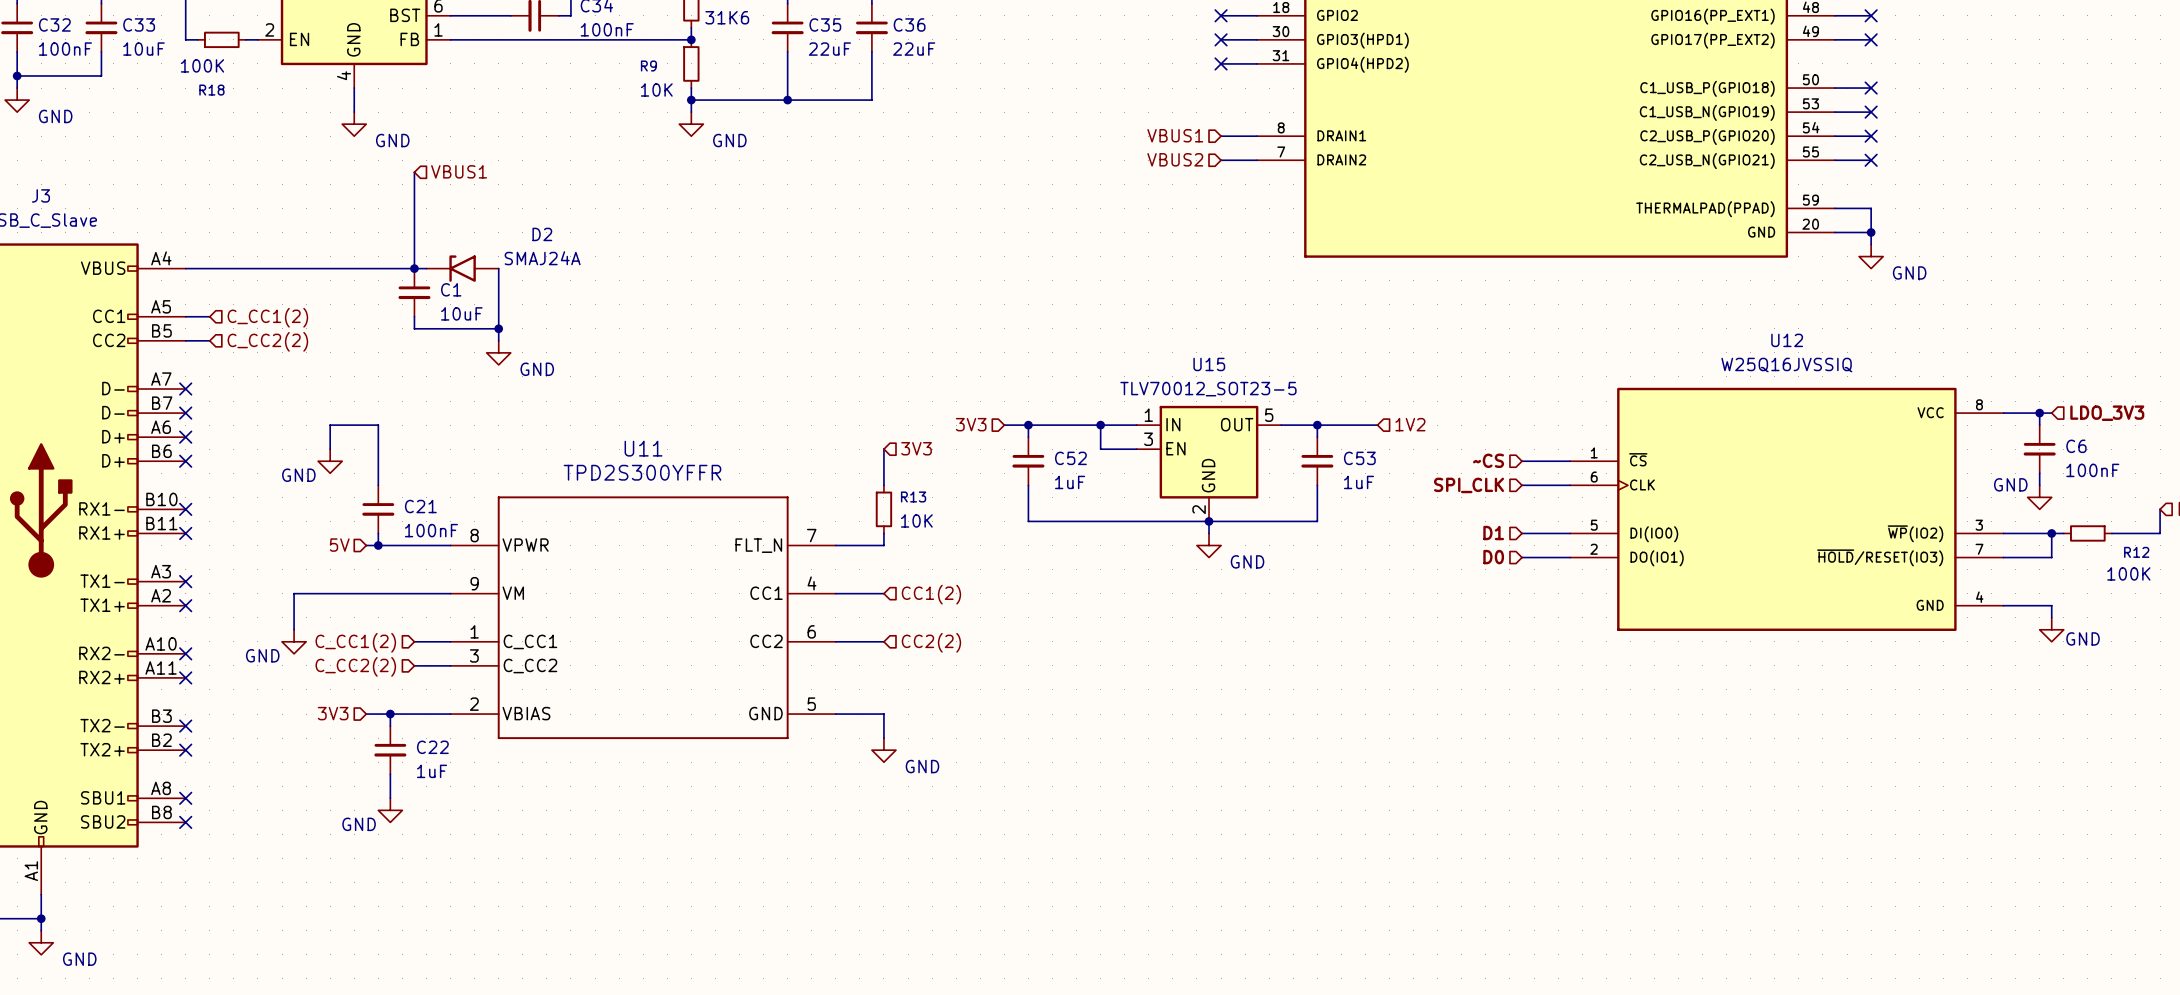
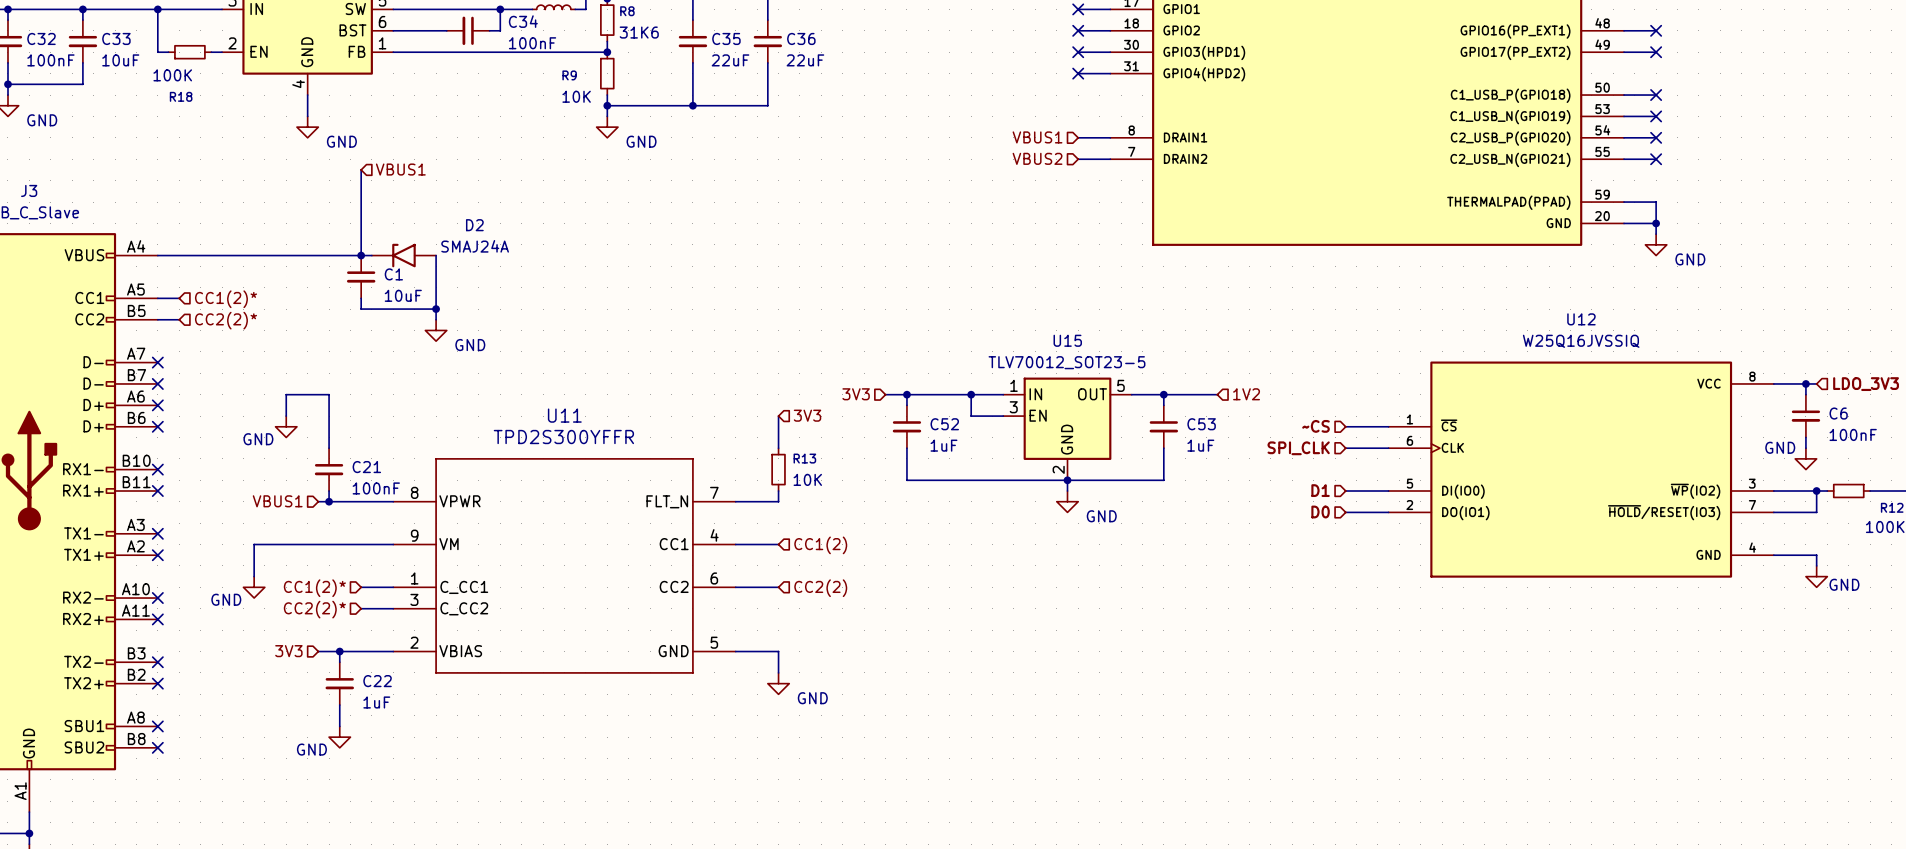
hierarchical label: C_CC1(2) (267, 317) -> CC1(2)* (226, 299)
hierarchical label: C_CC2(2) (267, 341) -> CC2(2)* (226, 320)
hierarchical label: 5V (339, 545) -> VBUS1 (277, 501)
hierarchical label: C_CC1(2) (355, 642) -> CC1(2)* (314, 588)
hierarchical label: C_CC2(2) (355, 666) -> CC2(2)* (314, 609)

